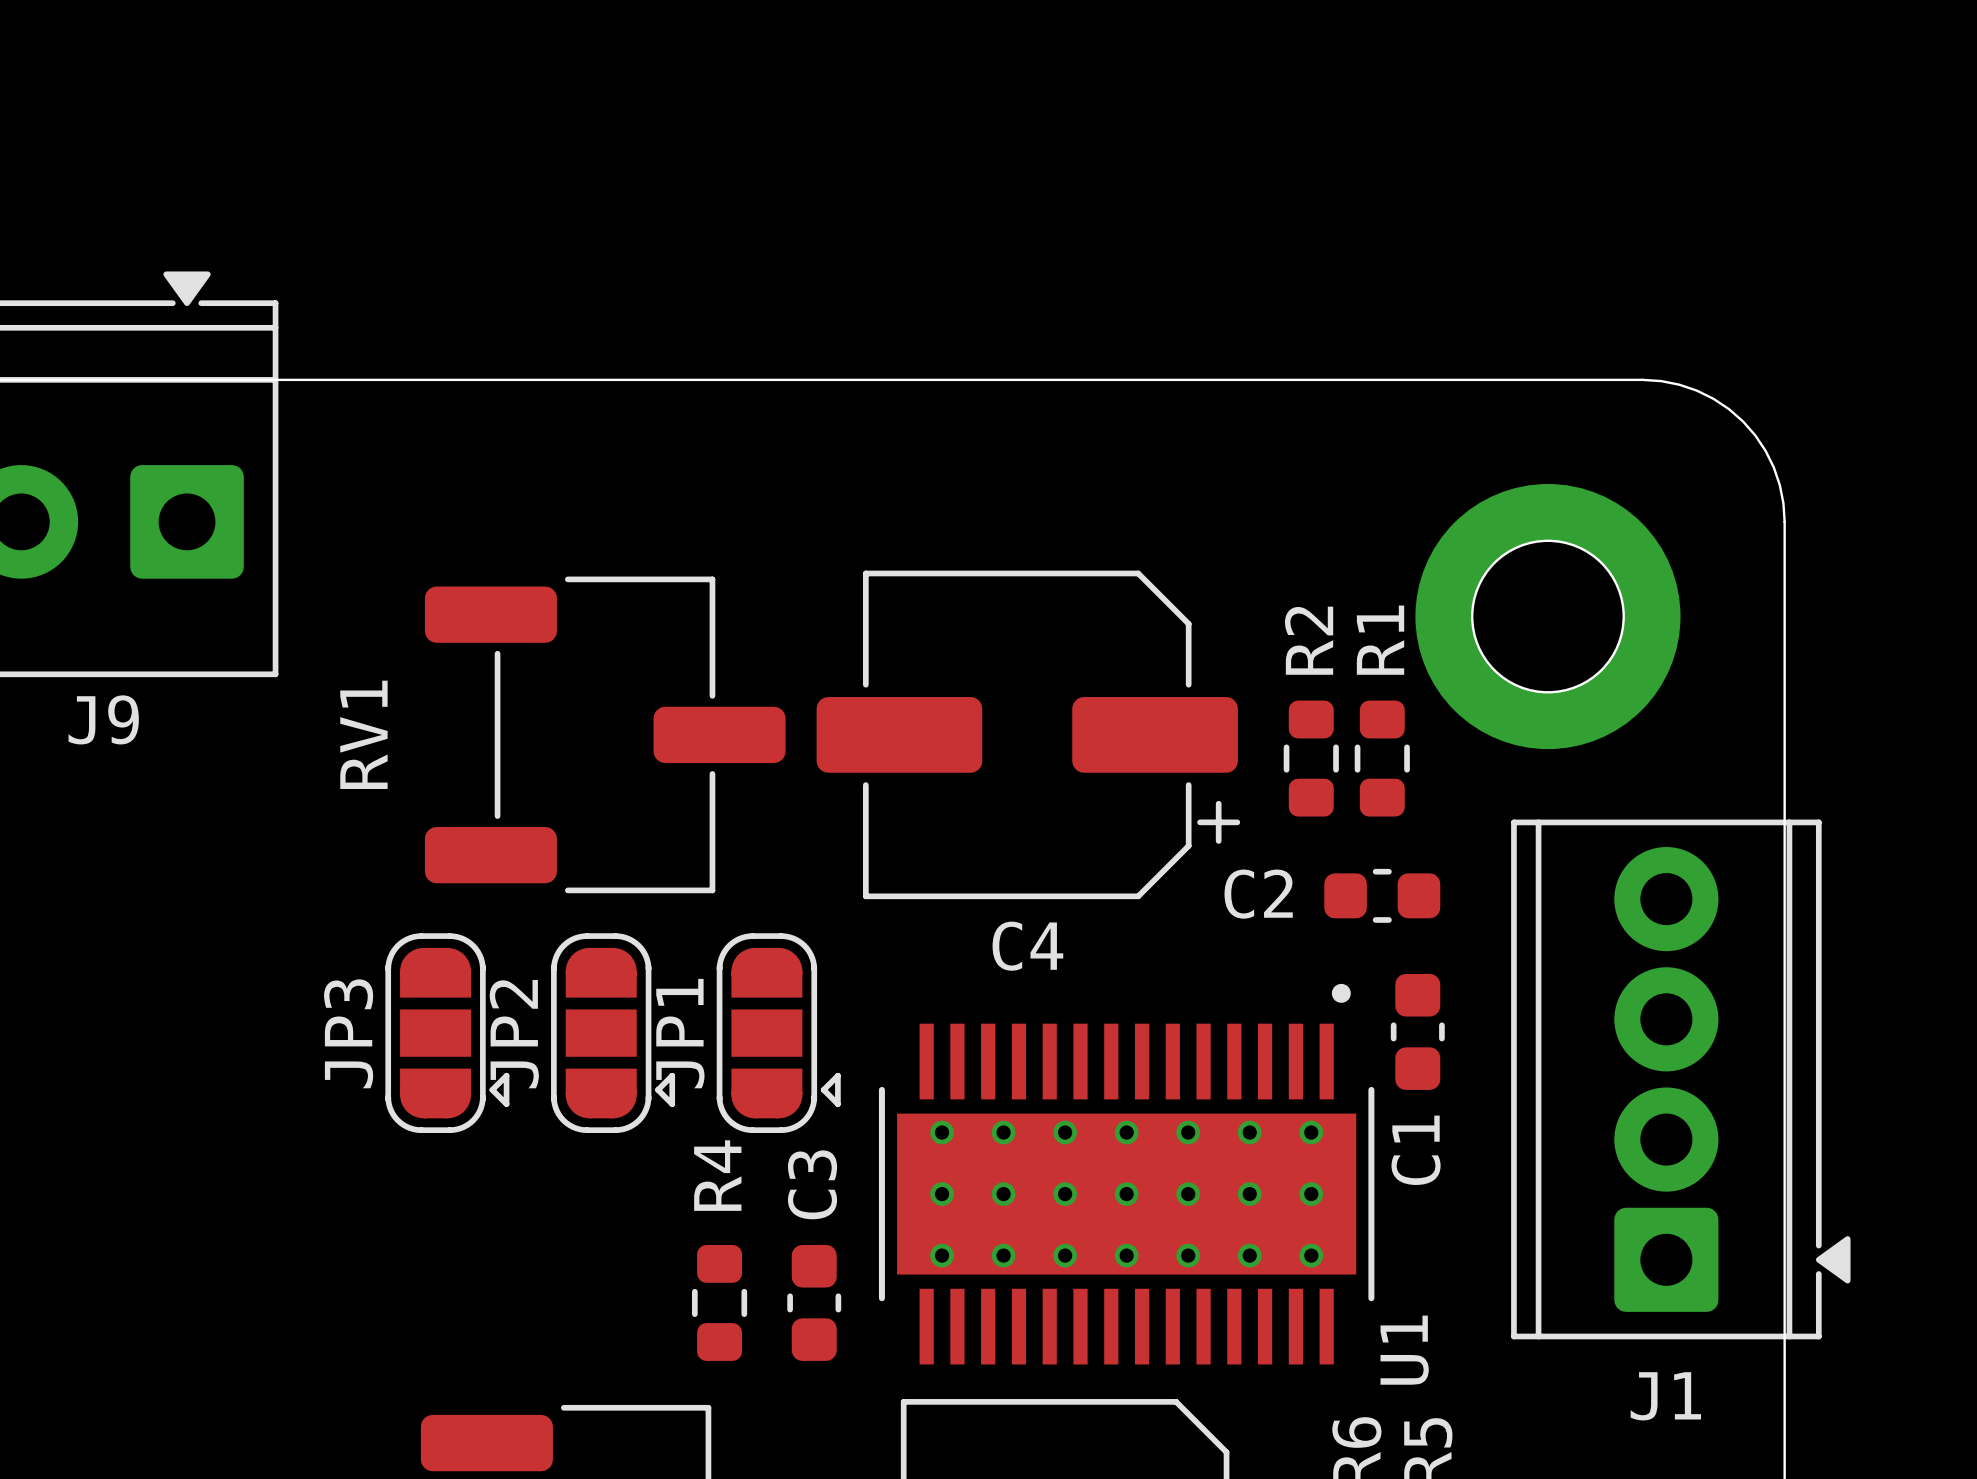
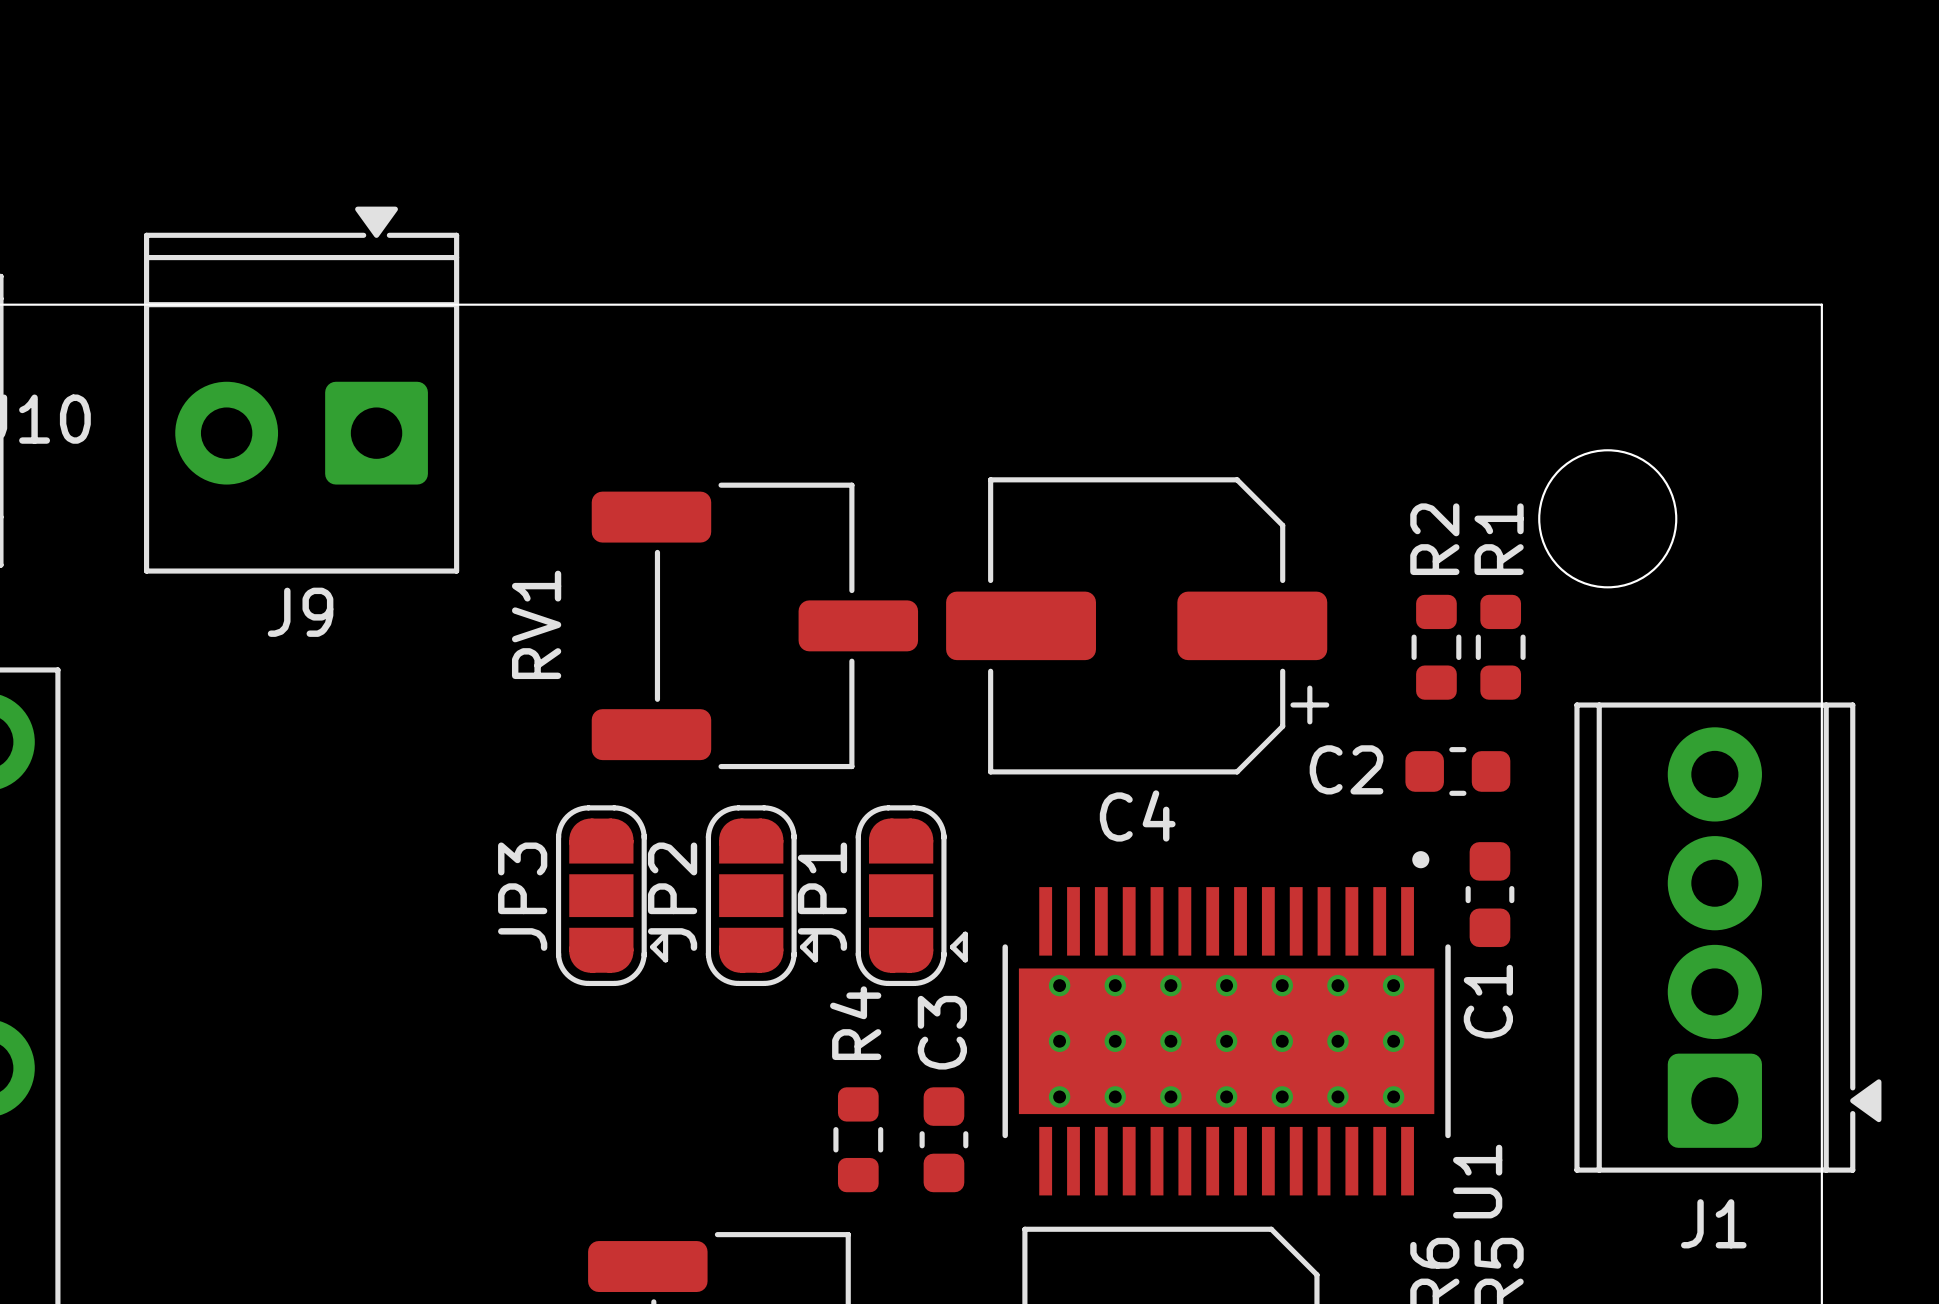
board edge: (1642, 379) (1661, 381) (1696, 390) (1729, 409) (1743, 421) (1765, 450) (1773, 467) (1779, 485) (1784, 521) -> (1693, 304) (1821, 304) (1821, 433)
part: (1547, 616) -> none
R2 position: (1311, 758) -> (1436, 647)
R1 position: (1382, 758) -> (1500, 647)

